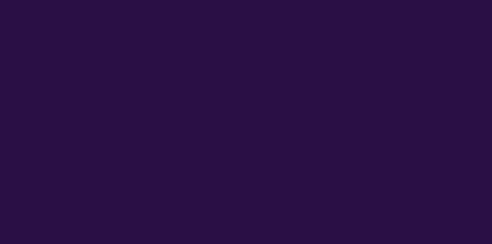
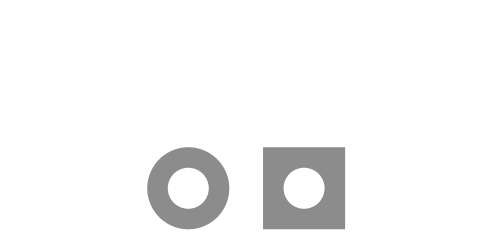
part: none -> (246, 188)

